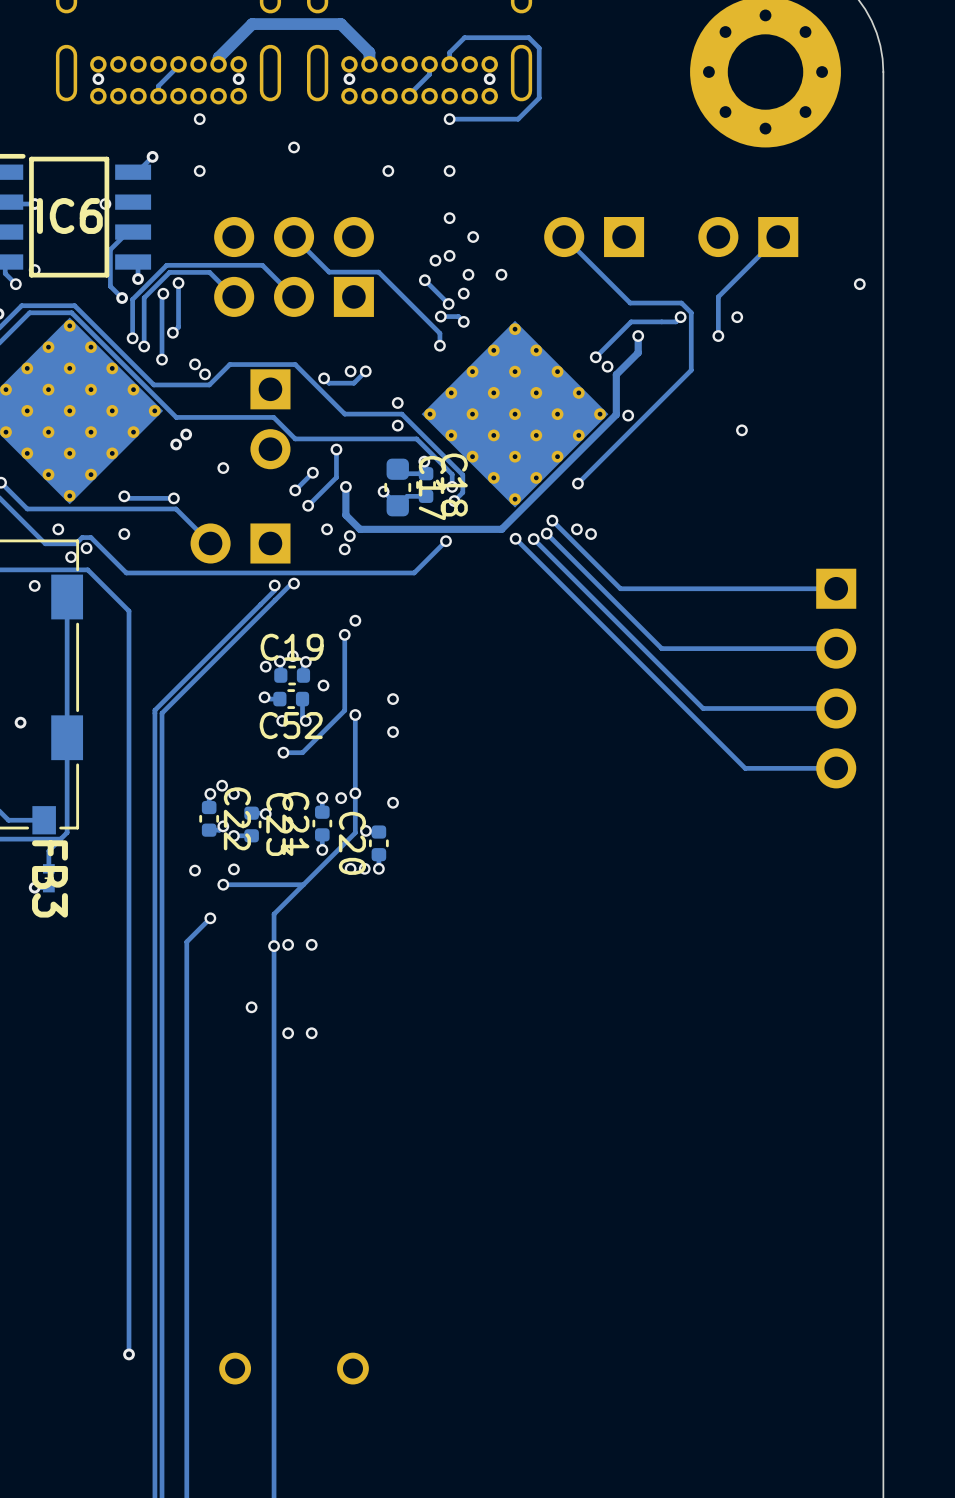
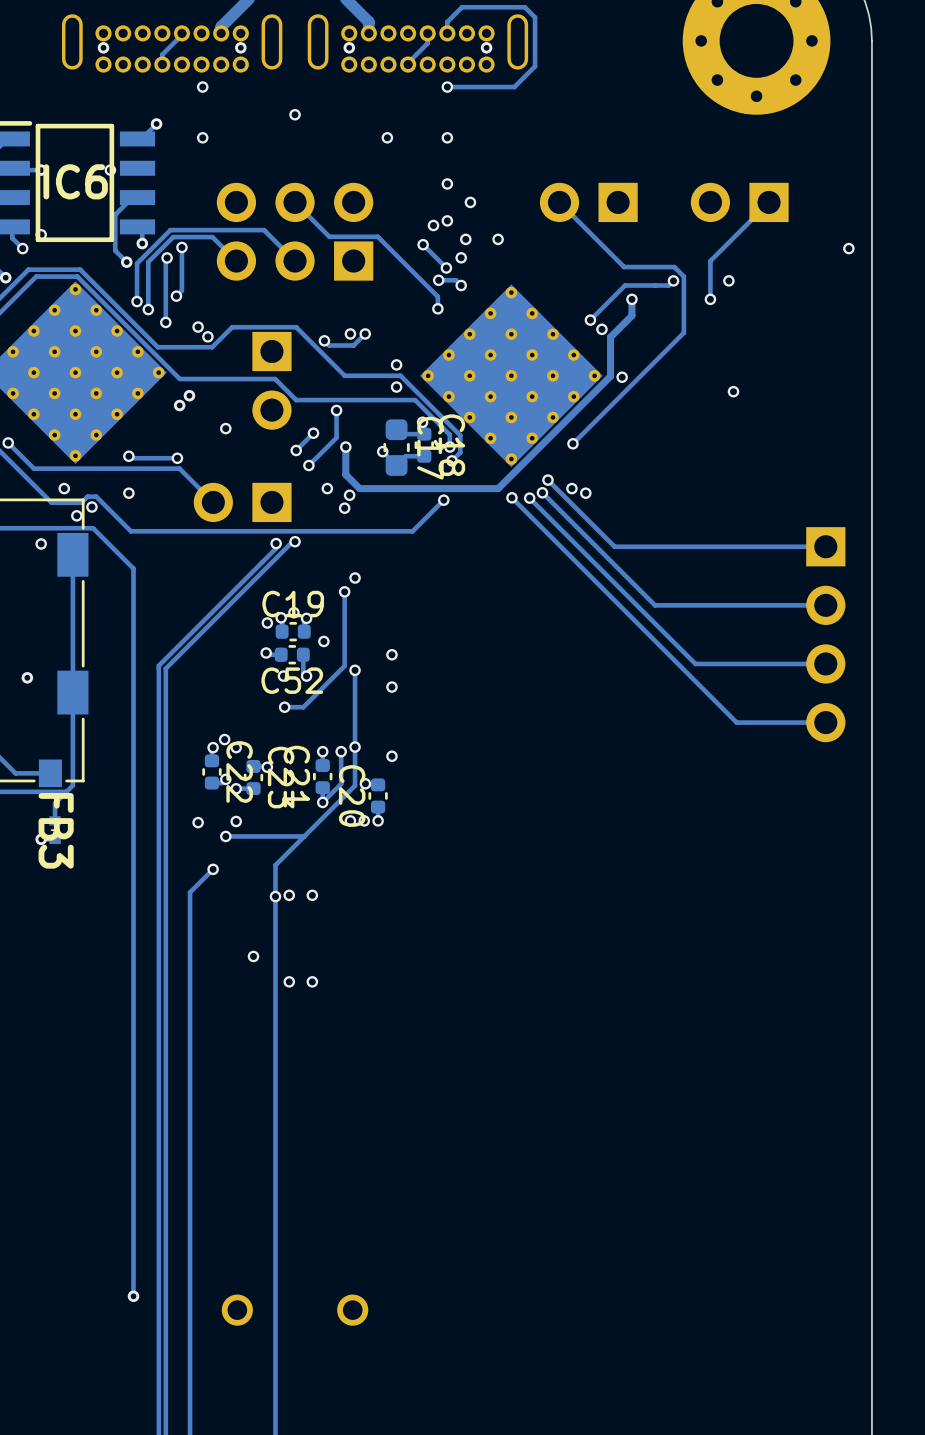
track: none -> (341, 751) (341, 783) (322, 802)

